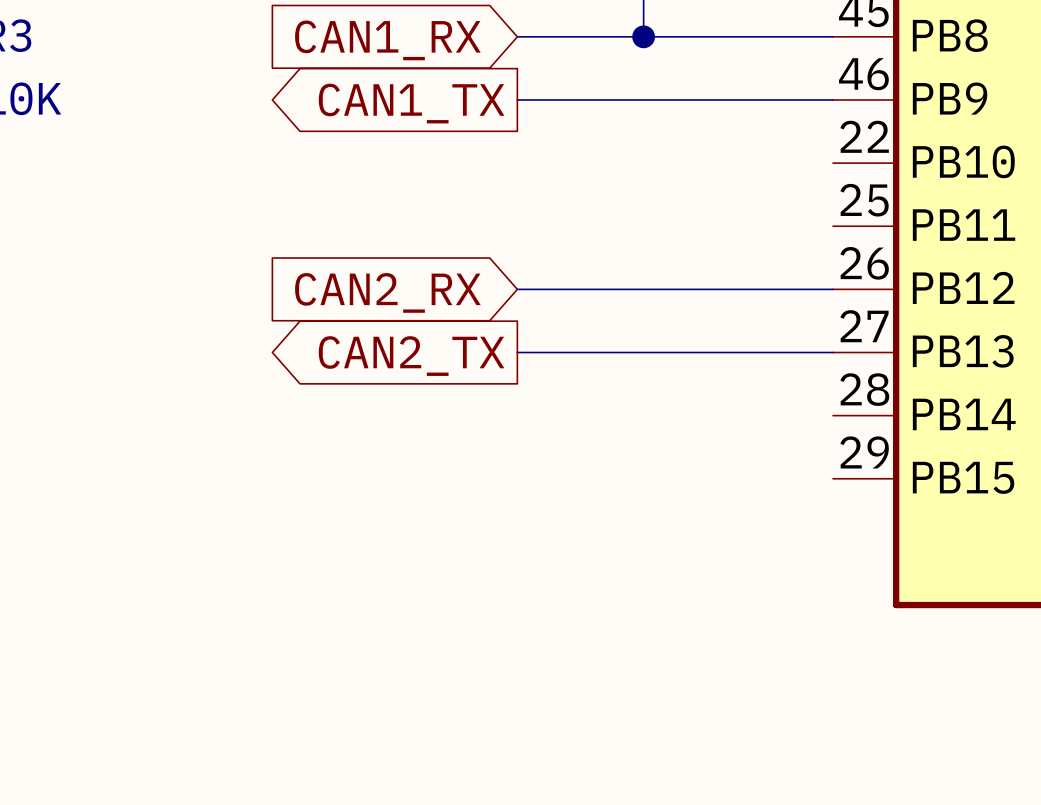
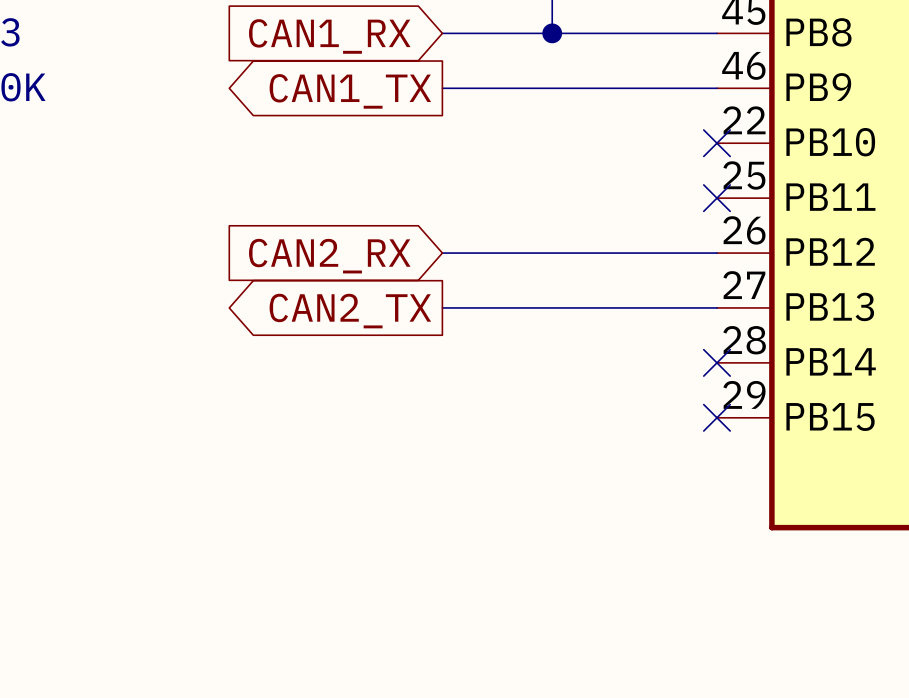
no-connect mark: none -> (716, 143)
no-connect mark: none -> (716, 198)
no-connect mark: none -> (716, 362)
no-connect mark: none -> (716, 417)

